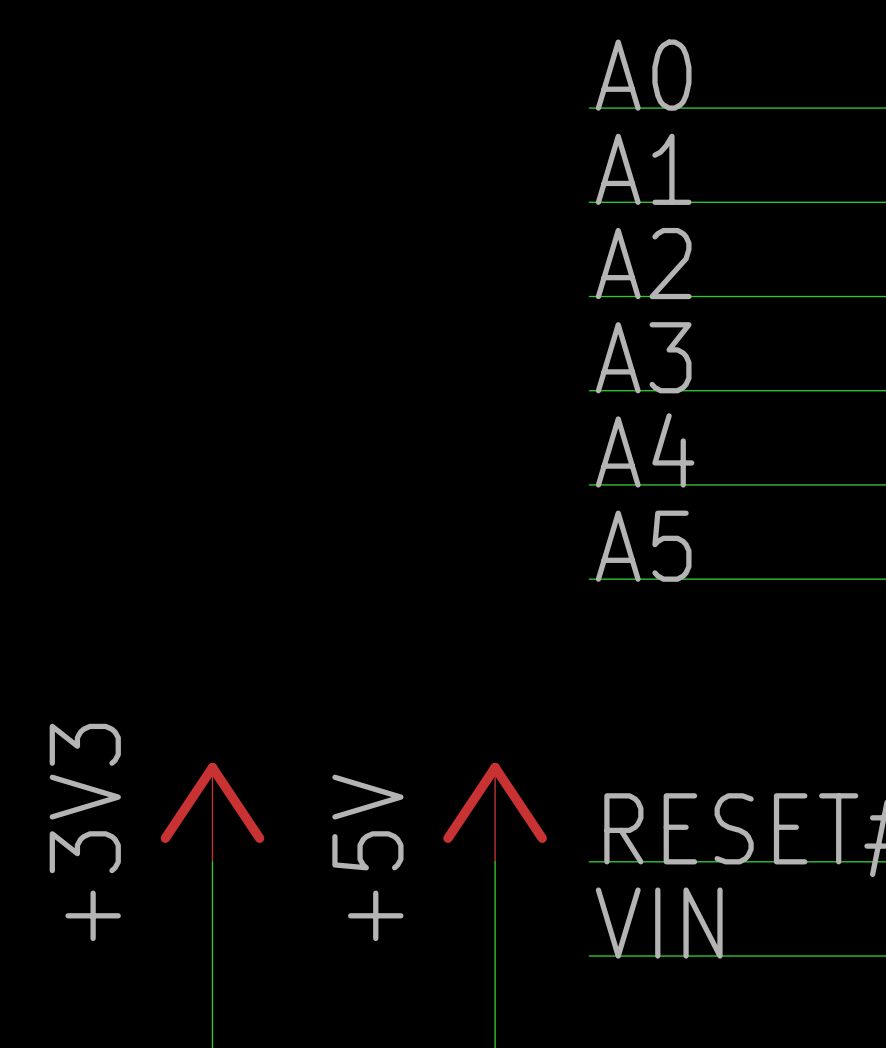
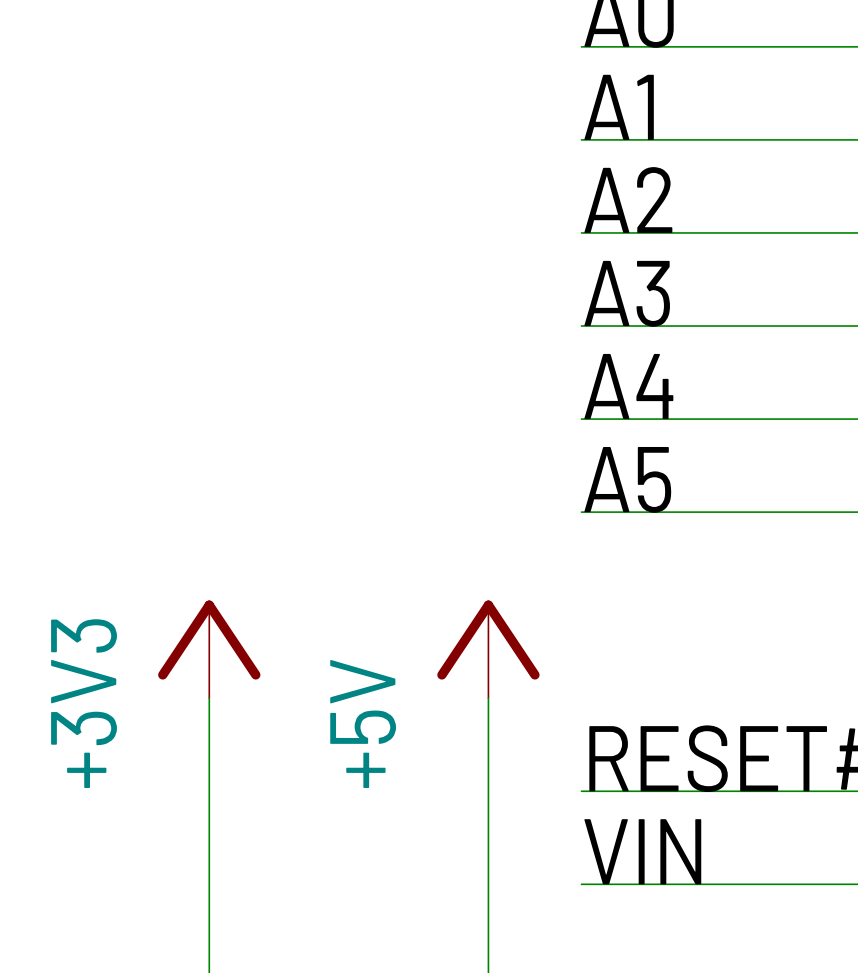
power symbol position: +3V3 (212, 812) -> +3V3 (209, 649)
power symbol position: +5V (495, 812) -> +5V (488, 649)

